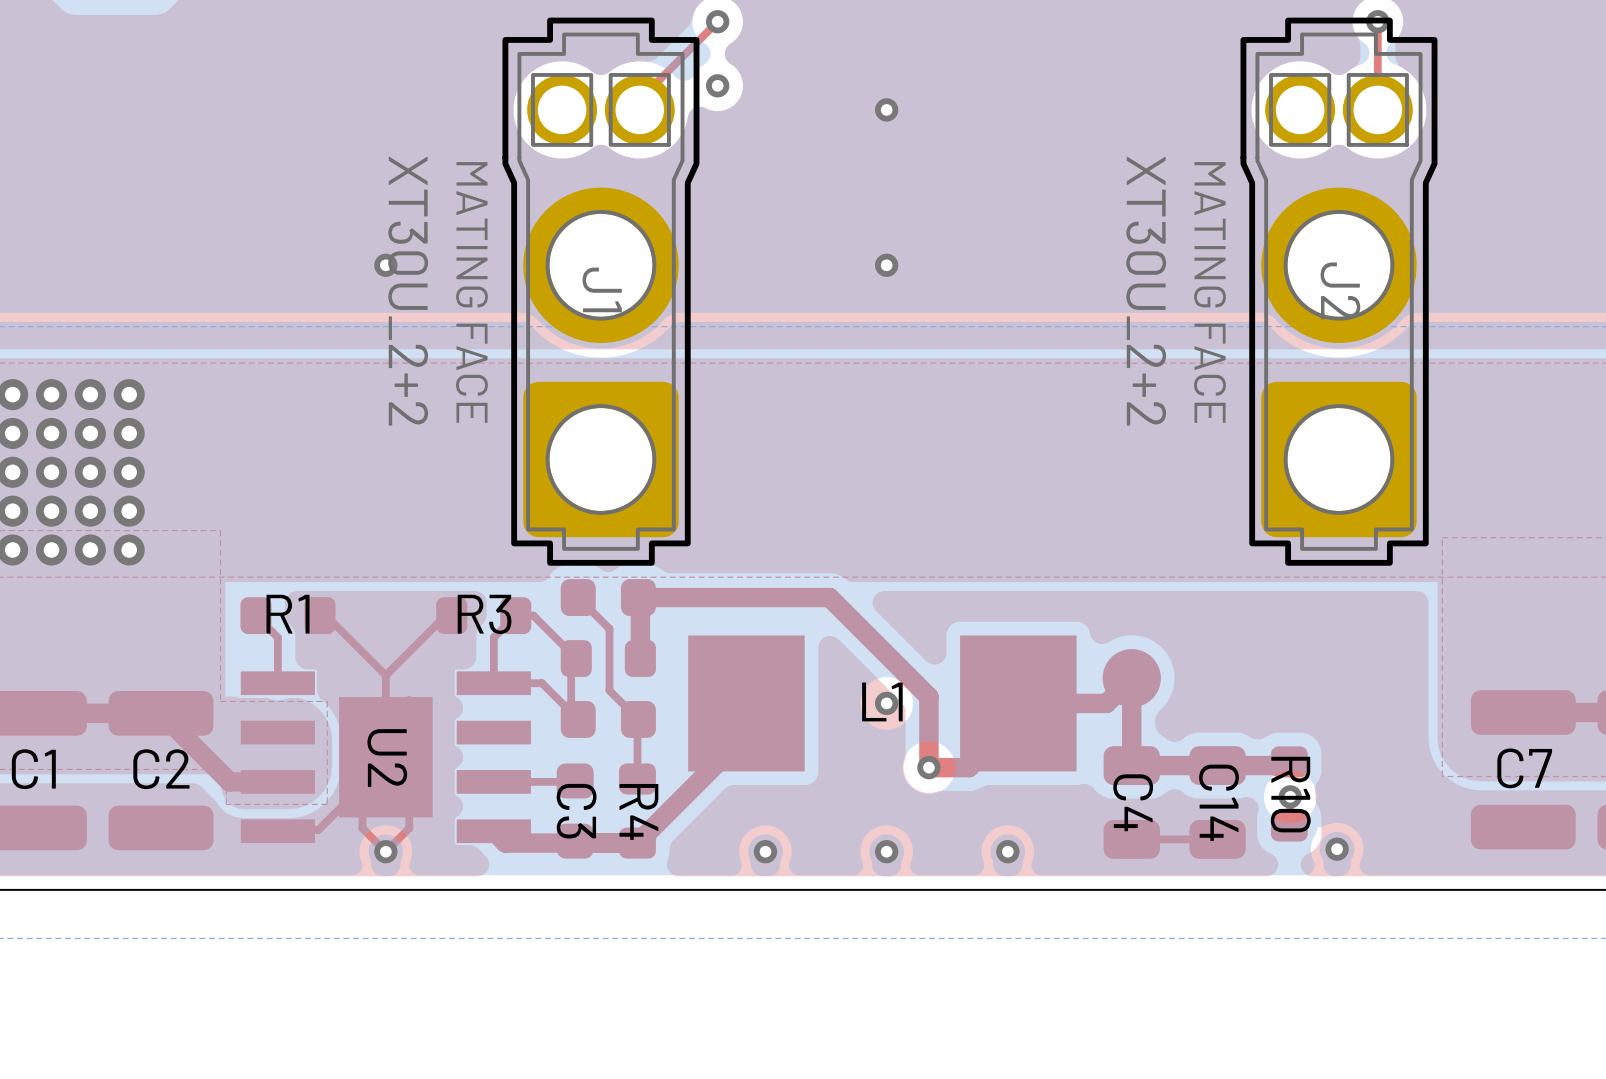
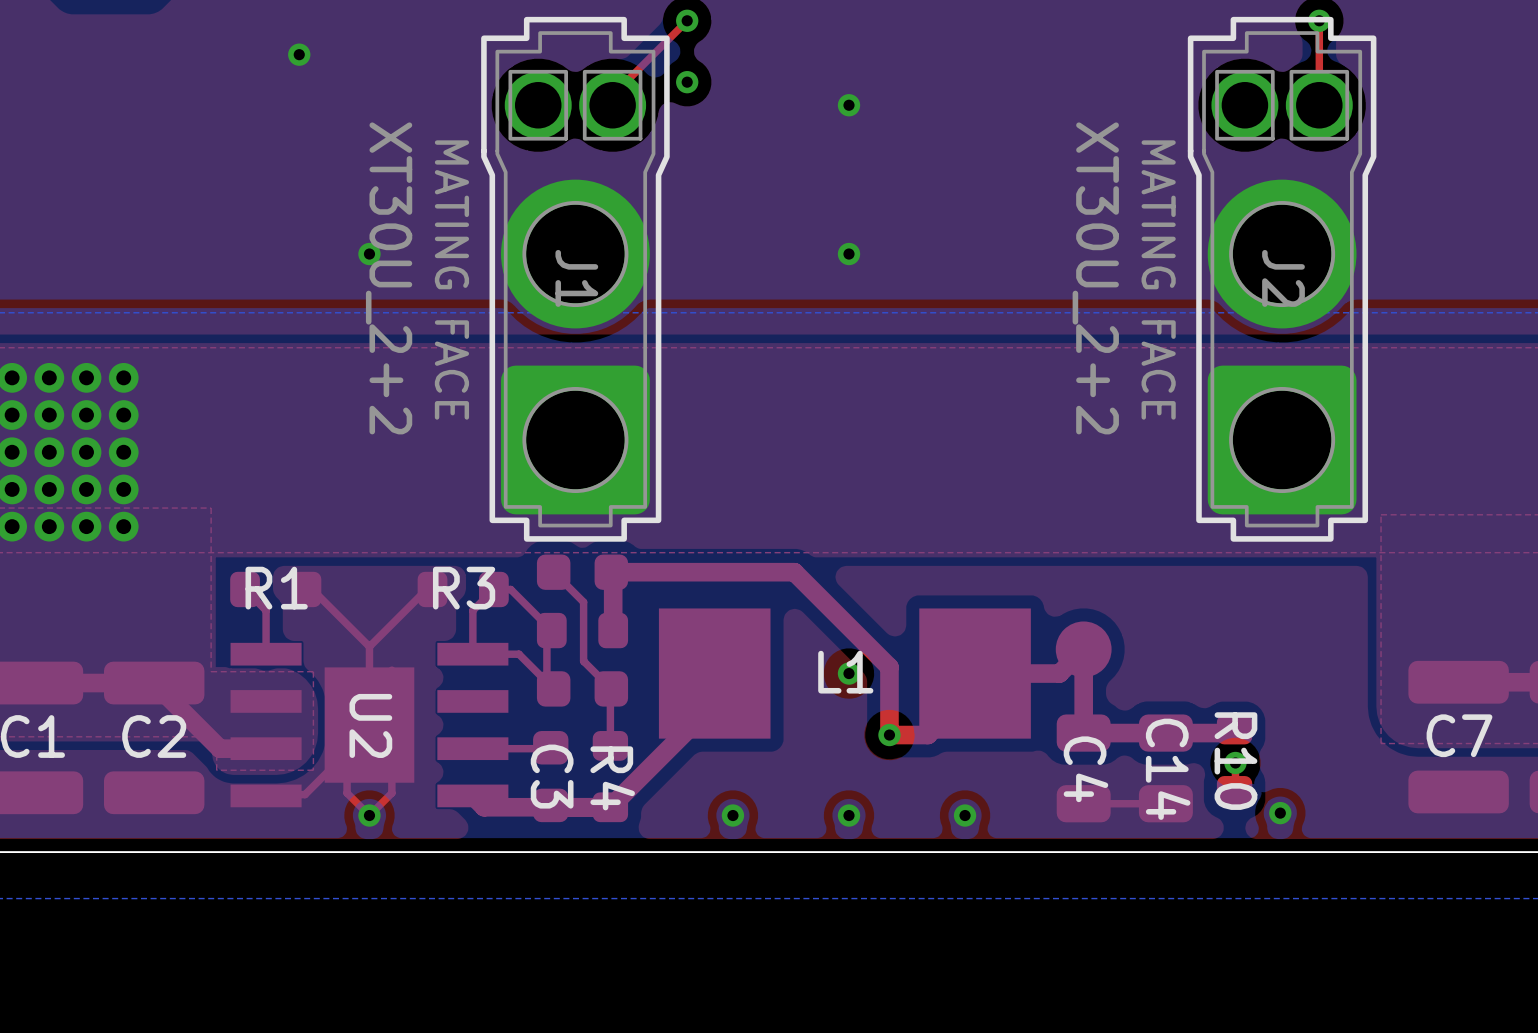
via: none -> (299, 54)

